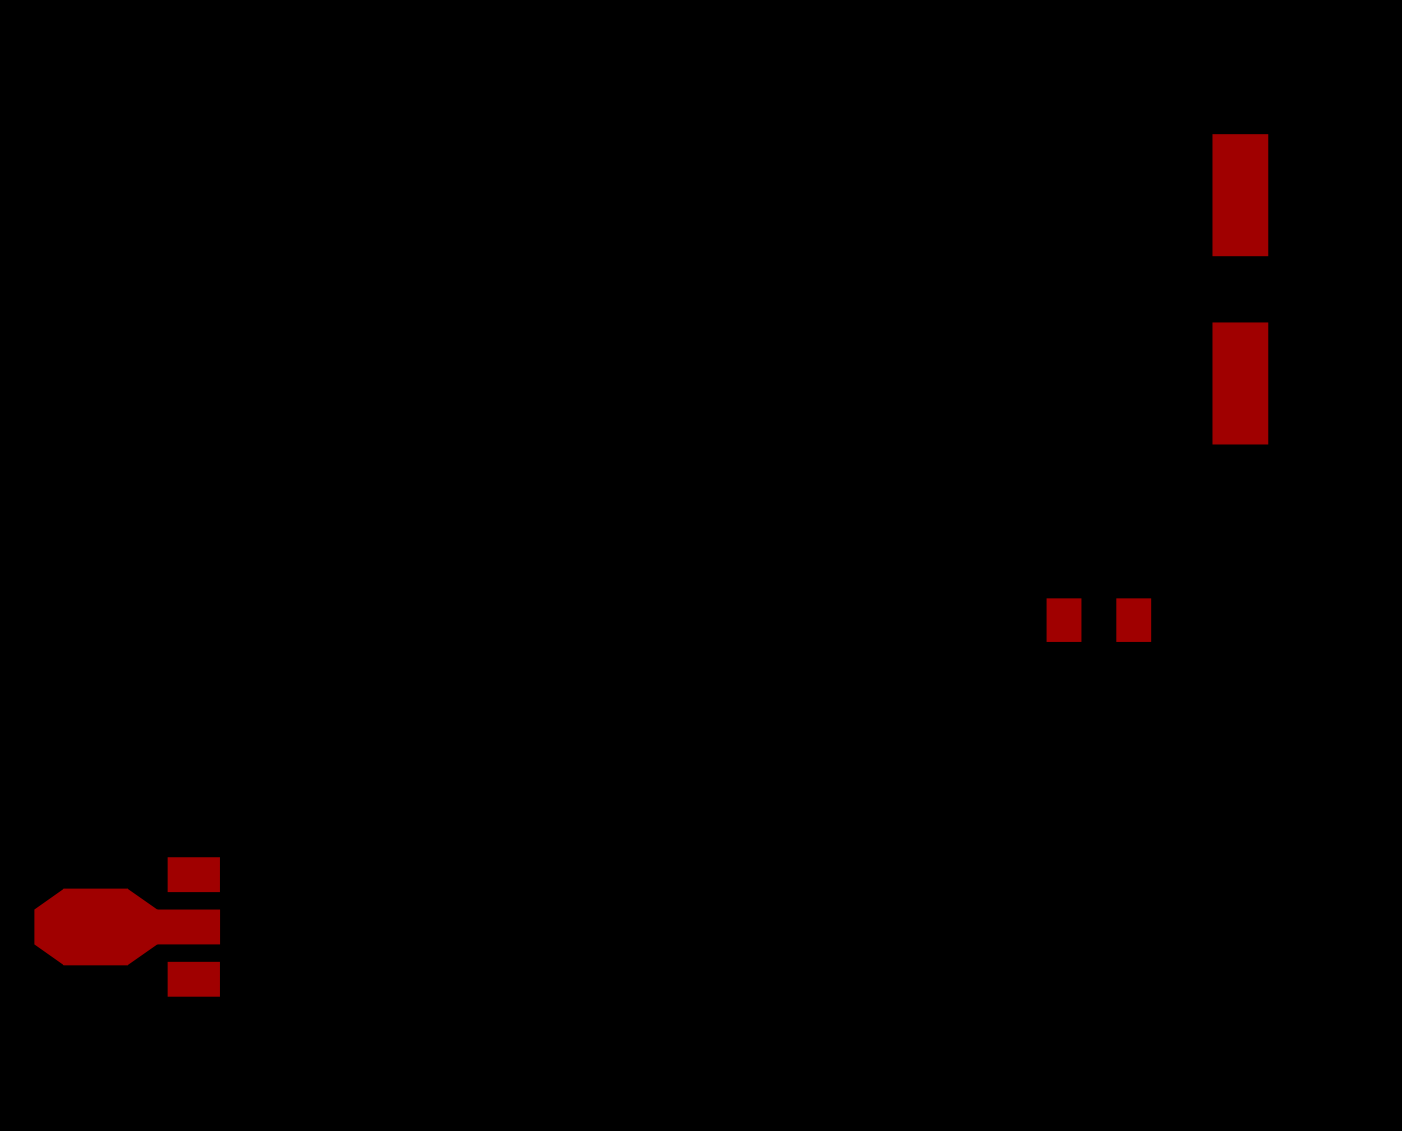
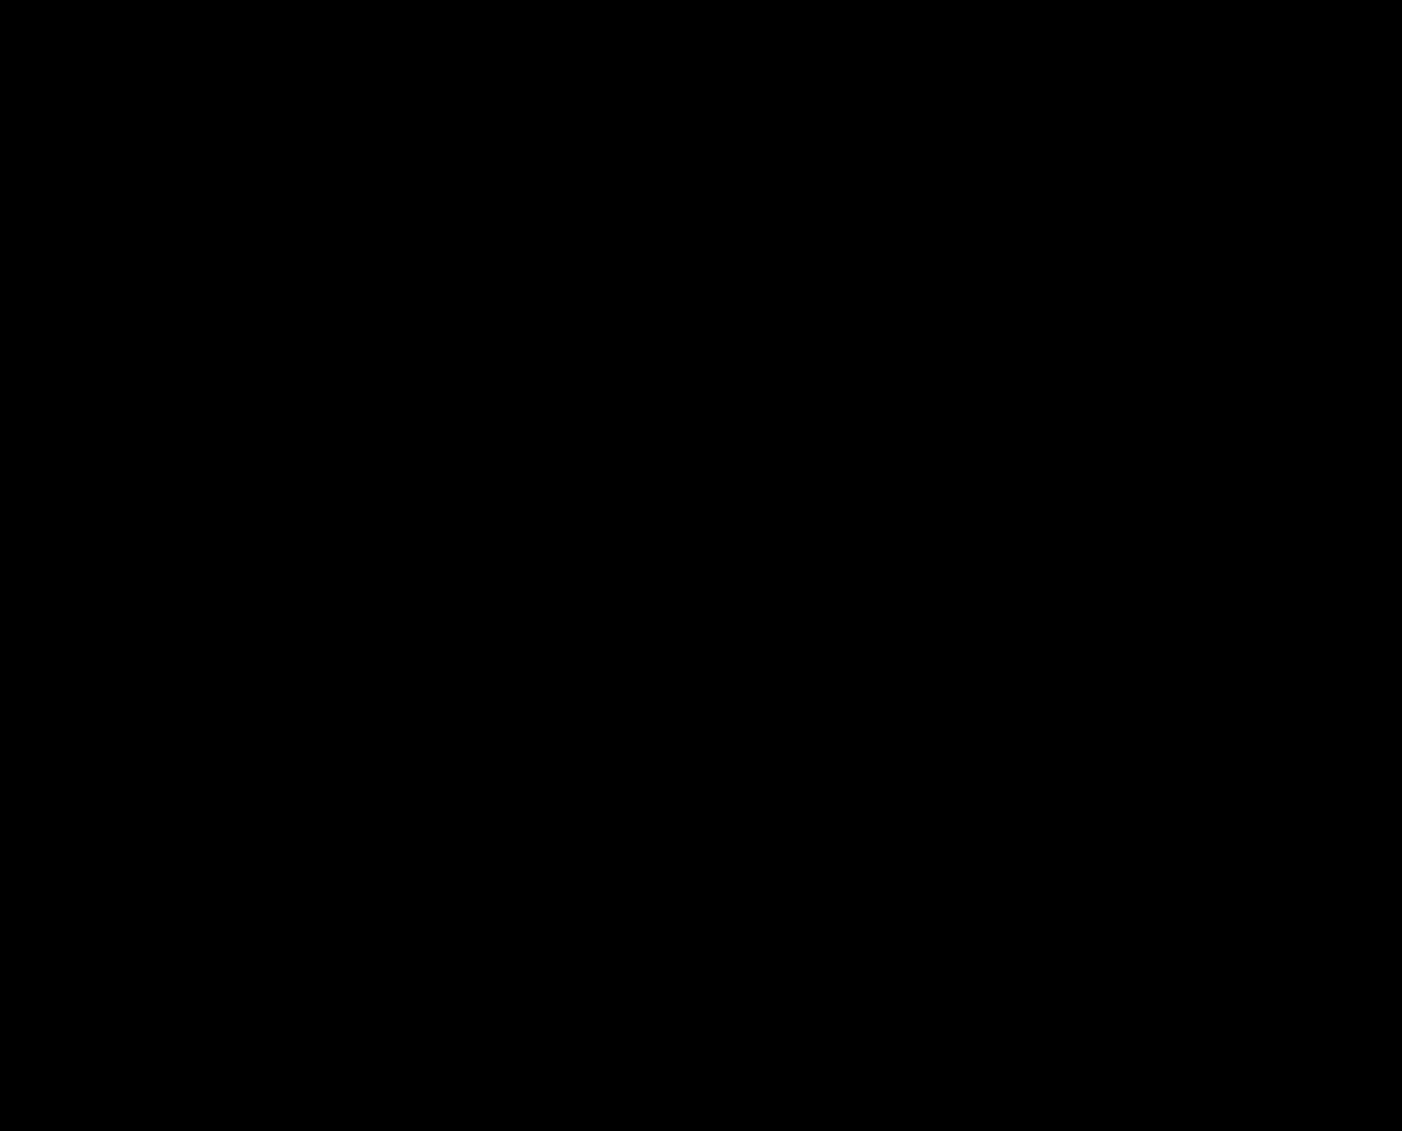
part: (1240, 289) -> none
part: (1098, 620) -> none
part: (127, 926) -> none

